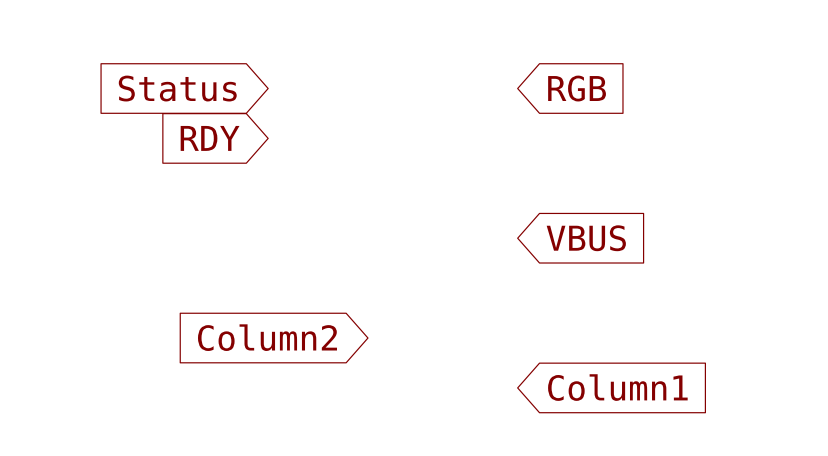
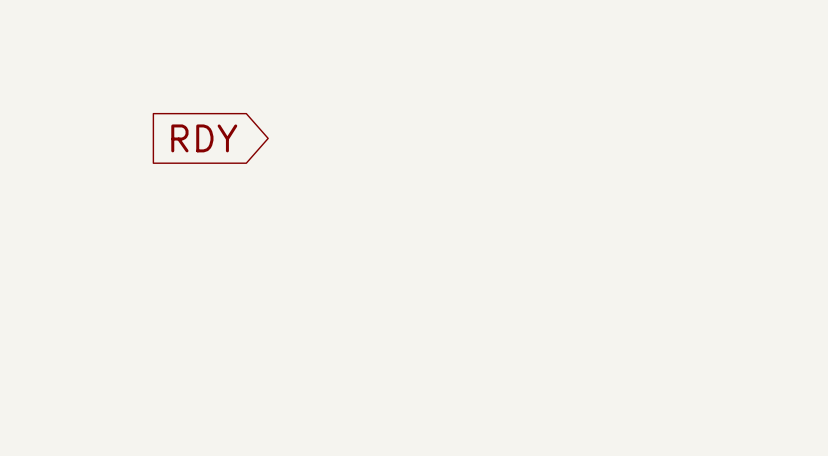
global label: Status (177, 88) -> none
global label: RGB (577, 88) -> none
global label: VBUS (586, 238) -> none
global label: Column2 (267, 337) -> none
global label: Column1 (617, 387) -> none

